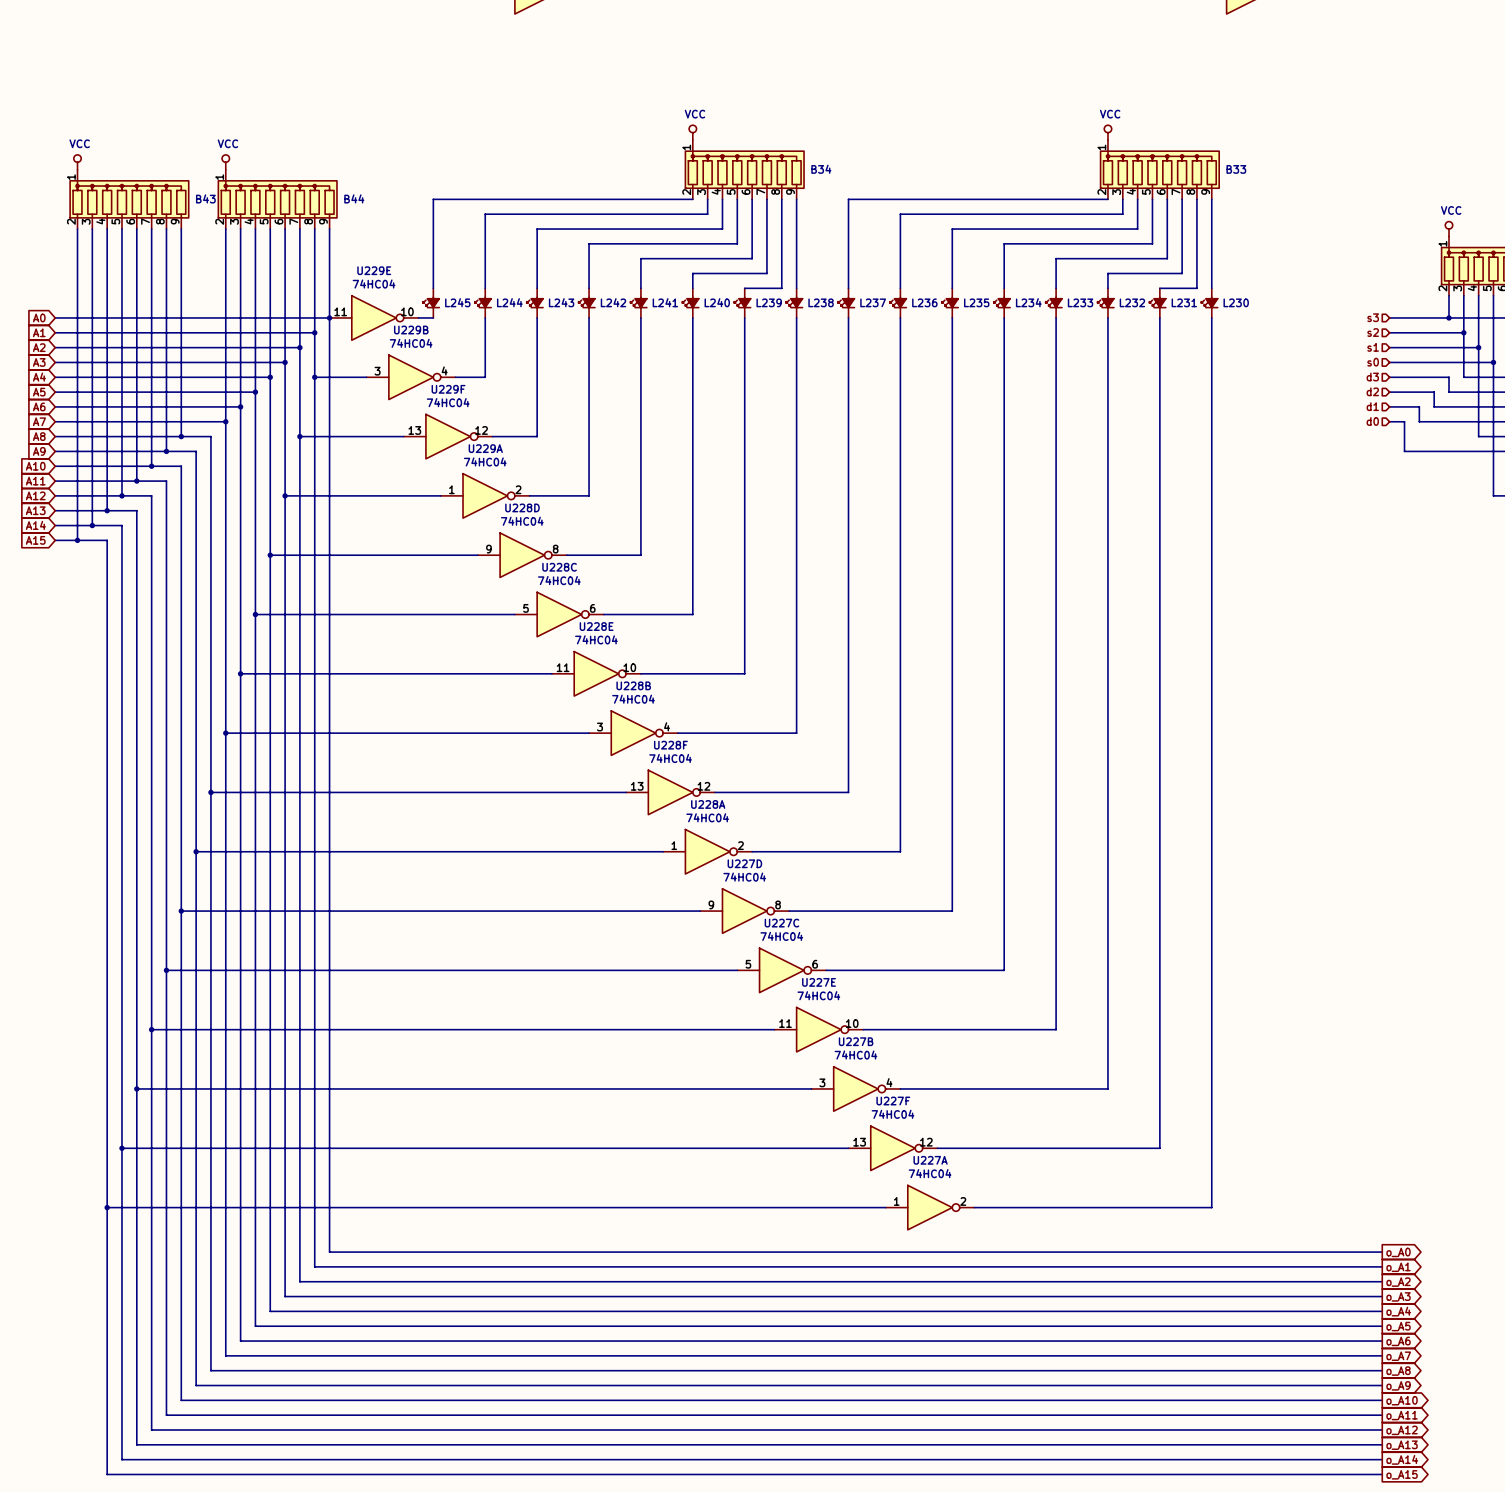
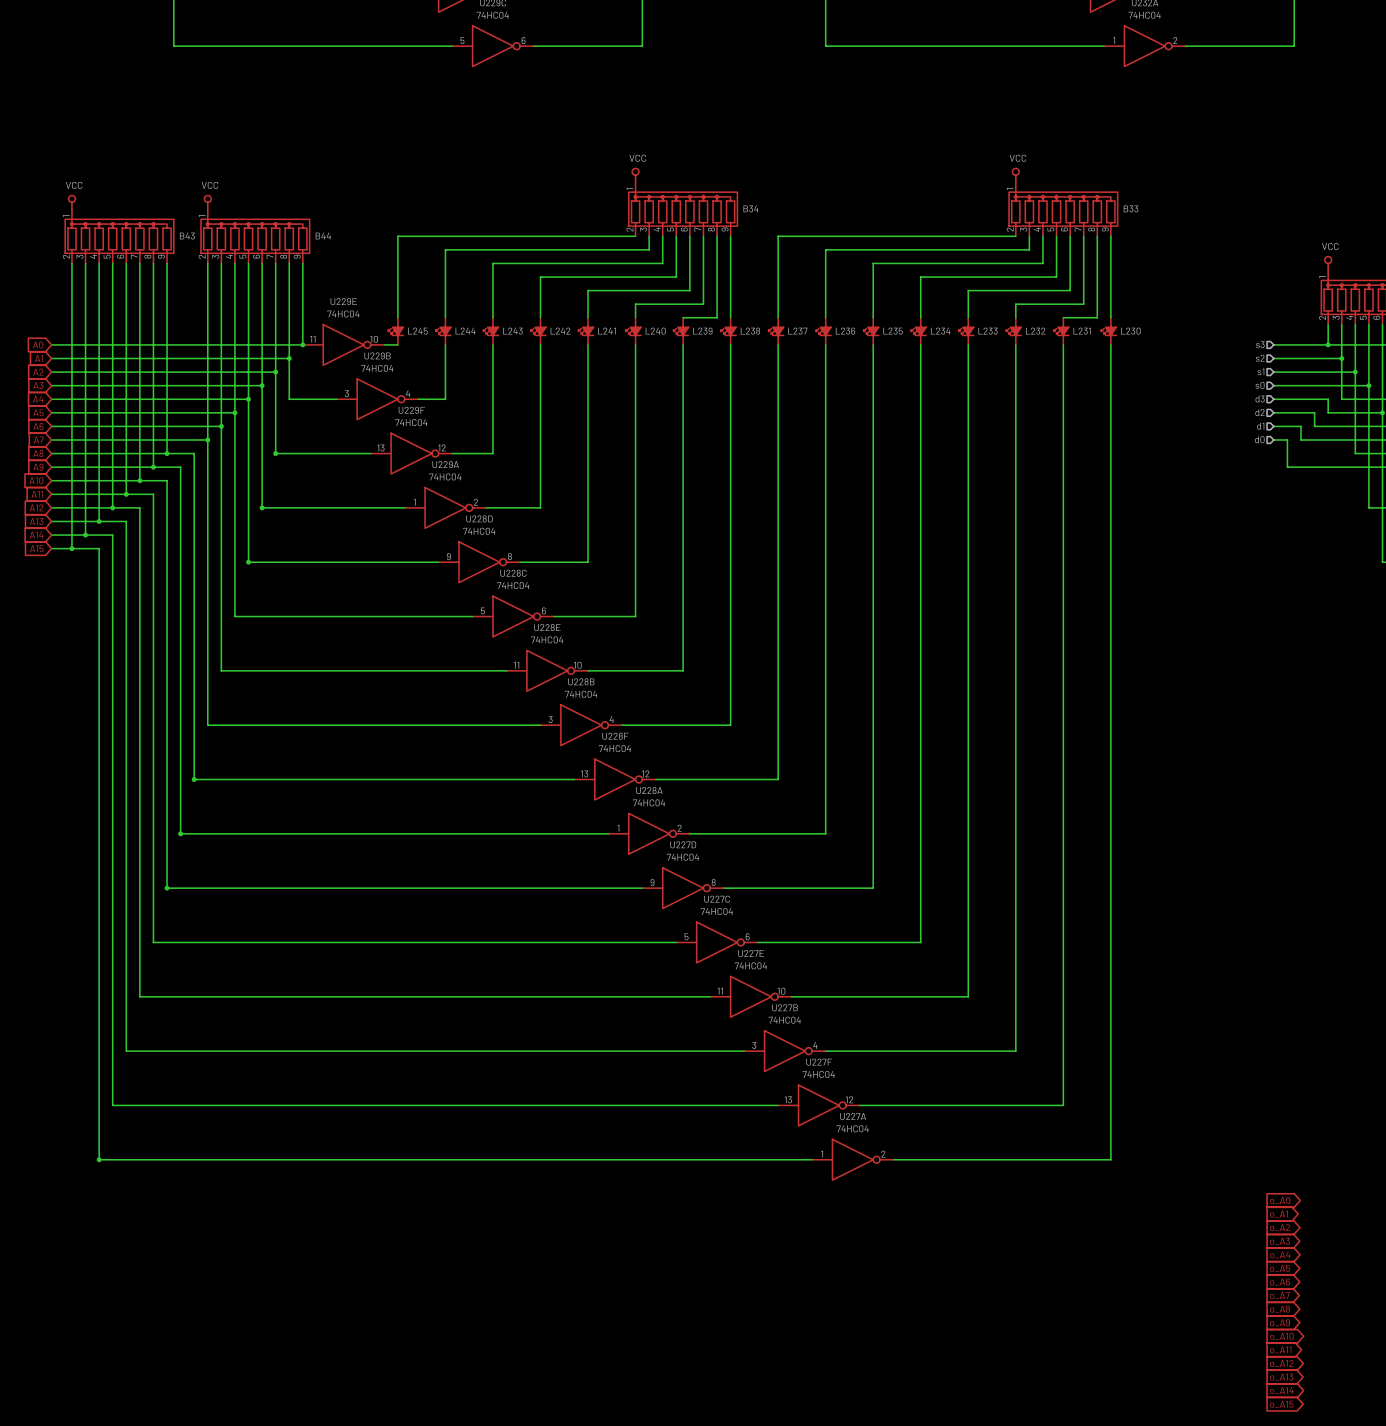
wire: (329, 317) (329, 1252) (1382, 1252) -> none
wire: (314, 377) (314, 1266) (1382, 1266) -> none
junction: (314, 377) -> none
wire: (299, 436) (299, 1281) (1382, 1281) -> none
wire: (285, 495) (285, 1296) (1382, 1296) -> none
wire: (270, 555) (270, 1311) (1382, 1311) -> none
wire: (255, 614) (255, 1326) (1382, 1326) -> none
junction: (255, 614) -> none
wire: (240, 673) (240, 1341) (1382, 1341) -> none
junction: (240, 673) -> none
wire: (225, 733) (225, 1355) (1382, 1355) -> none
junction: (225, 733) -> none
wire: (210, 792) (210, 1370) (1382, 1370) -> none
wire: (196, 851) (196, 1385) (1382, 1385) -> none
wire: (181, 911) (181, 1400) (1382, 1400) -> none
wire: (166, 970) (166, 1415) (1382, 1415) -> none
junction: (166, 970) -> none
wire: (151, 1029) (151, 1430) (1382, 1430) -> none
junction: (151, 1029) -> none
wire: (136, 1088) (136, 1444) (1382, 1444) -> none
junction: (136, 1088) -> none
wire: (121, 1148) (121, 1459) (1382, 1459) -> none
junction: (121, 1148) -> none
wire: (107, 1207) (107, 1474) (1382, 1474) -> none

